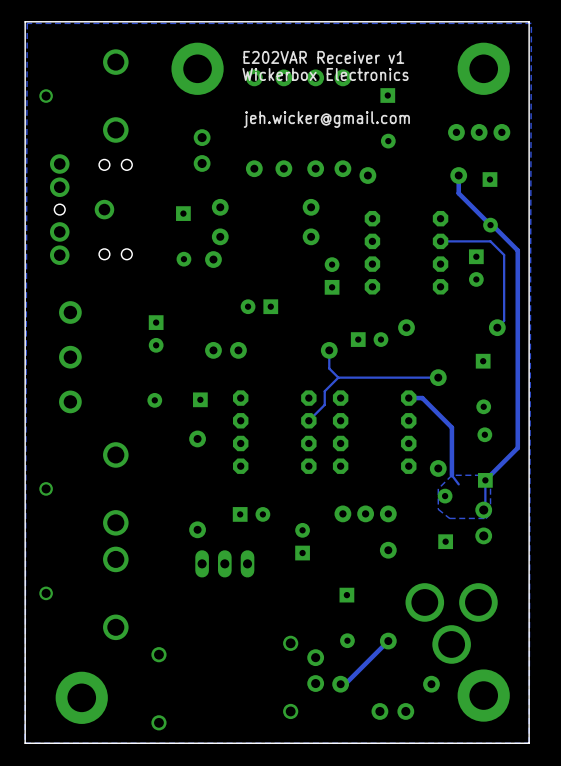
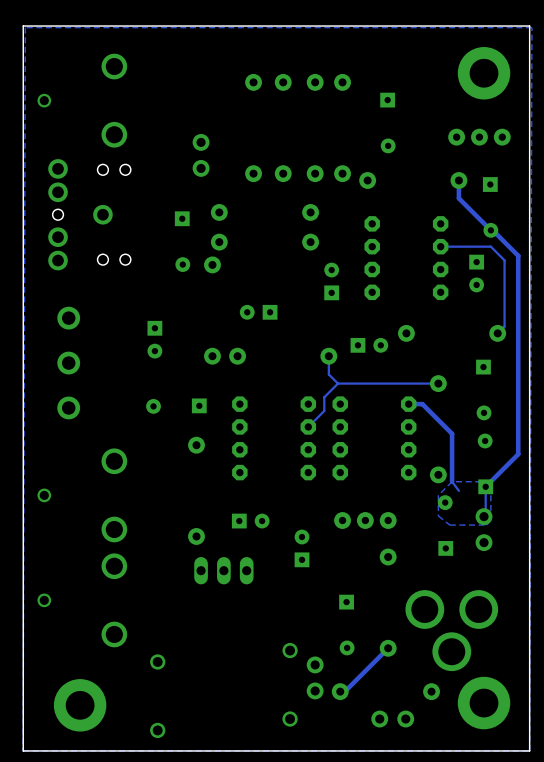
text: E202VAR Receiver v1 (323, 57) -> none
part: (197, 68) -> none
text: Wickerbox Electronics (325, 74) -> none
text: jeh.wicker@gmail.com (326, 119) -> none

